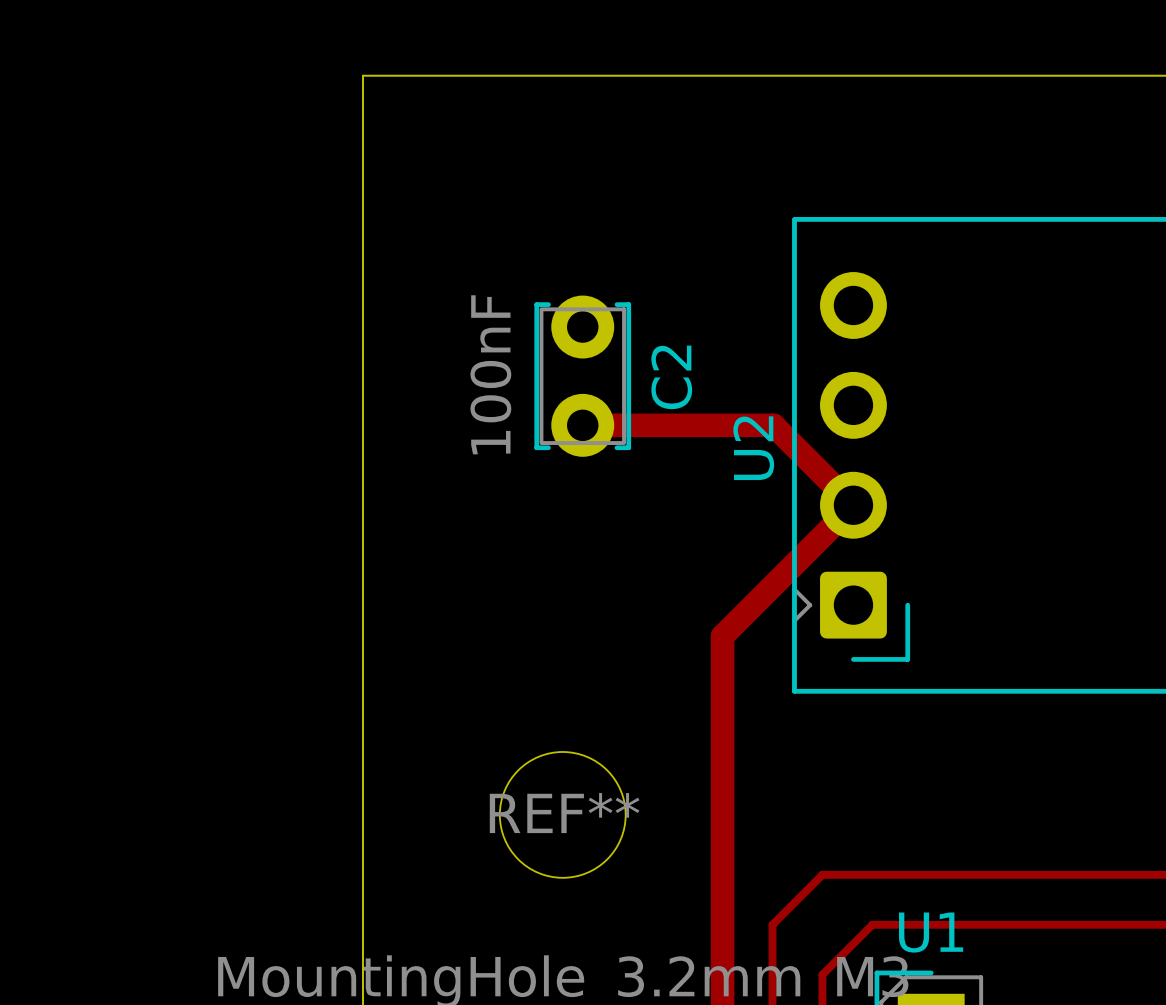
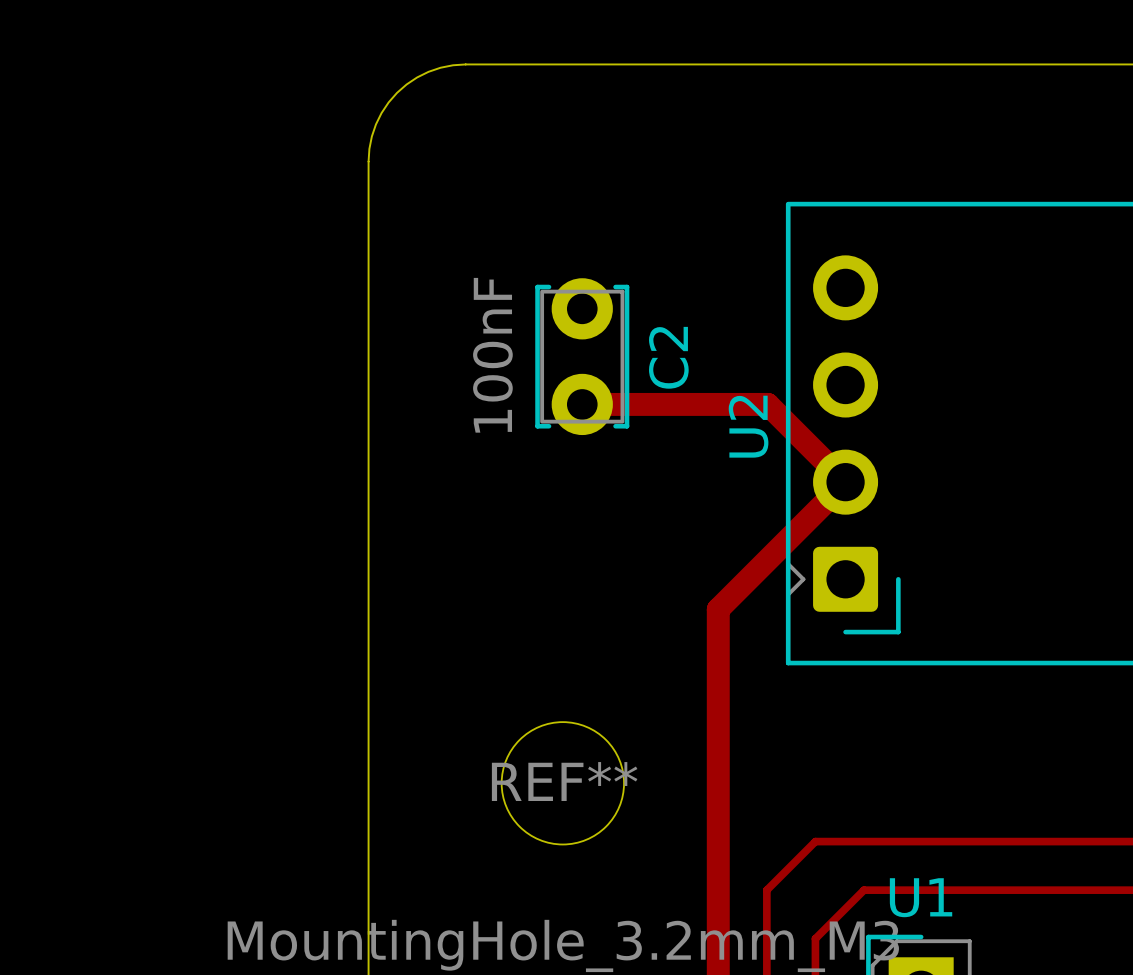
board edge: (462, 75) (362, 75) (362, 175) -> (465, 64) (453, 65) (428, 71) (406, 84) (397, 92) (388, 102) (375, 124) (369, 148) (368, 161)

